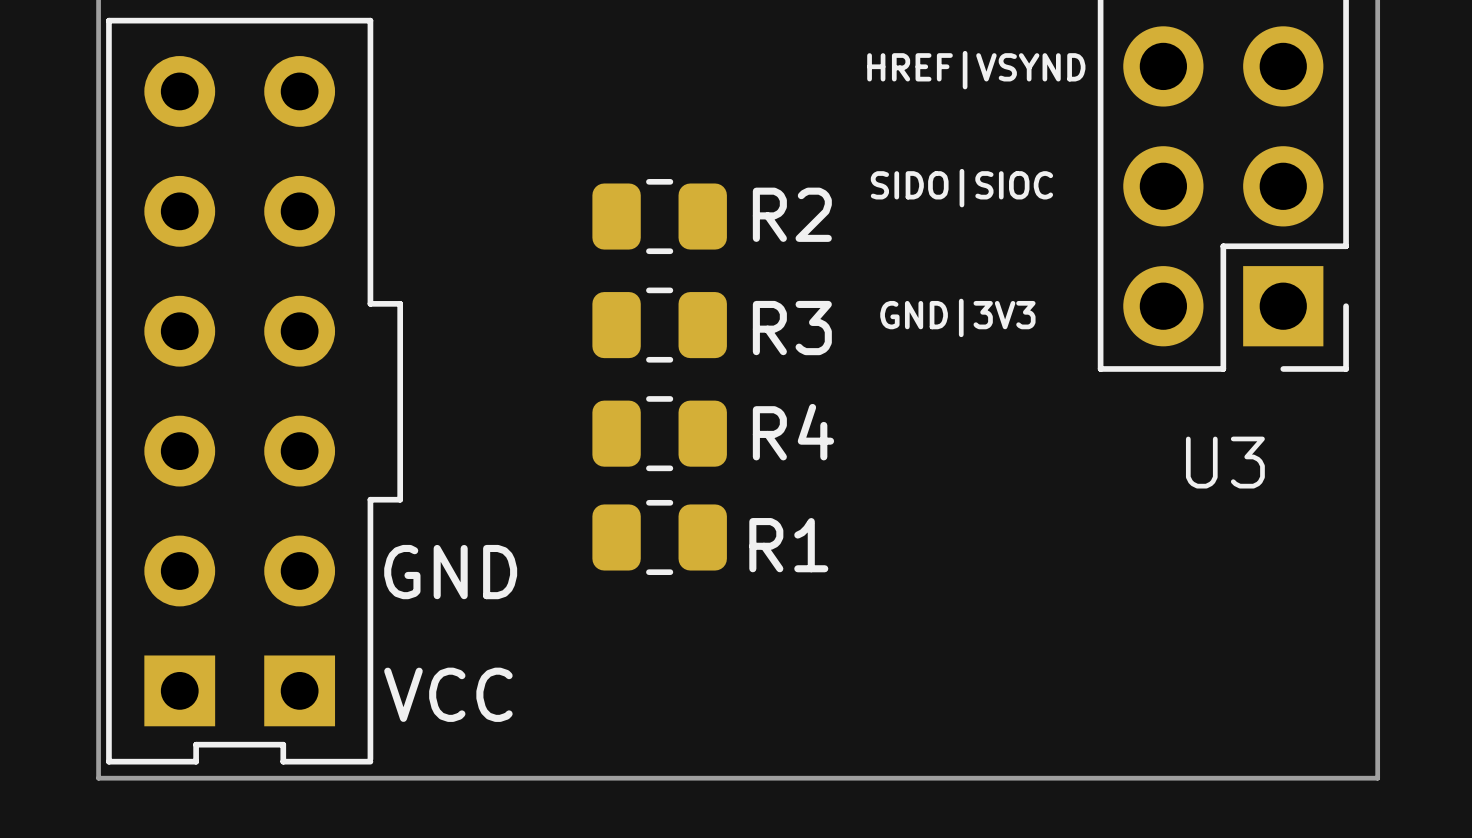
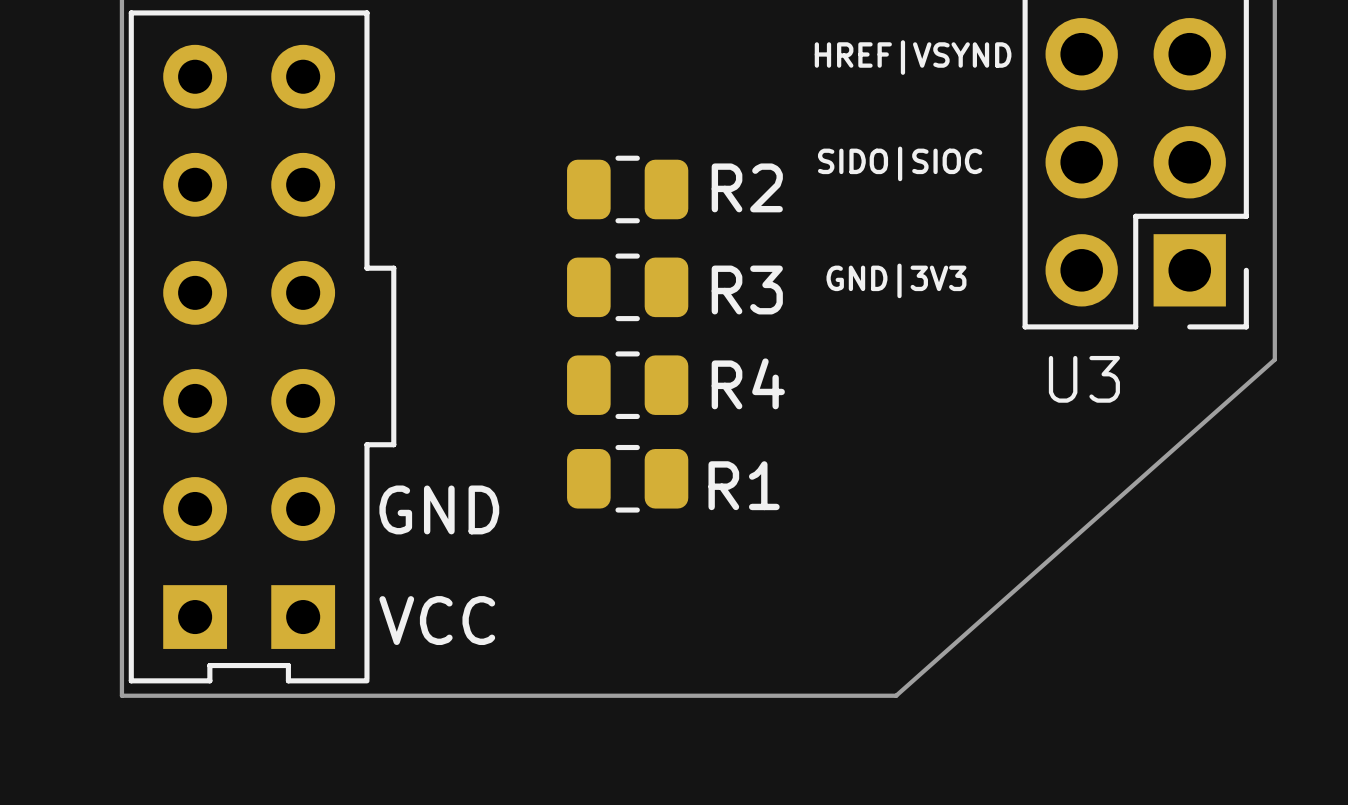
board edge: (1377, 405) (1377, 778) (957, 778) -> (1274, 359) (896, 695)
U3 name position: U3 (1225, 462) -> U3 (1084, 379)

